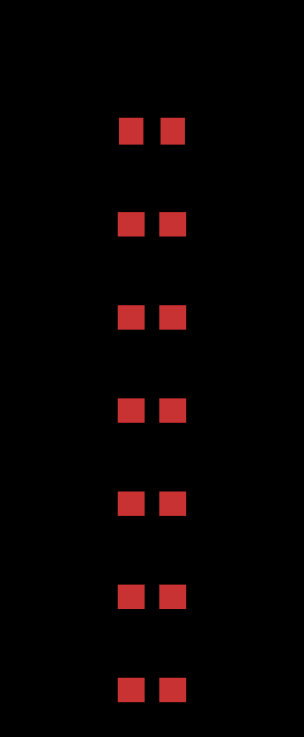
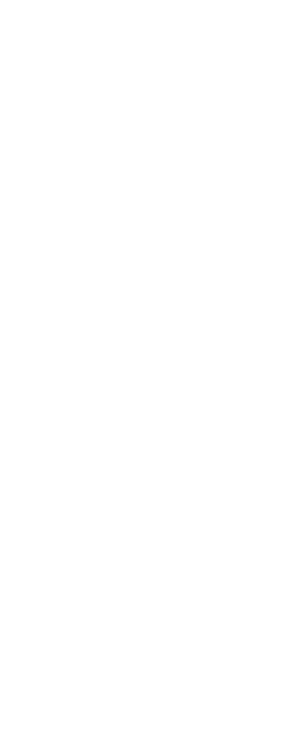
part: (151, 131) -> none
part: (151, 224) -> none
part: (151, 317) -> none
part: (151, 410) -> none
part: (151, 503) -> none
part: (151, 596) -> none
part: (151, 689) -> none

